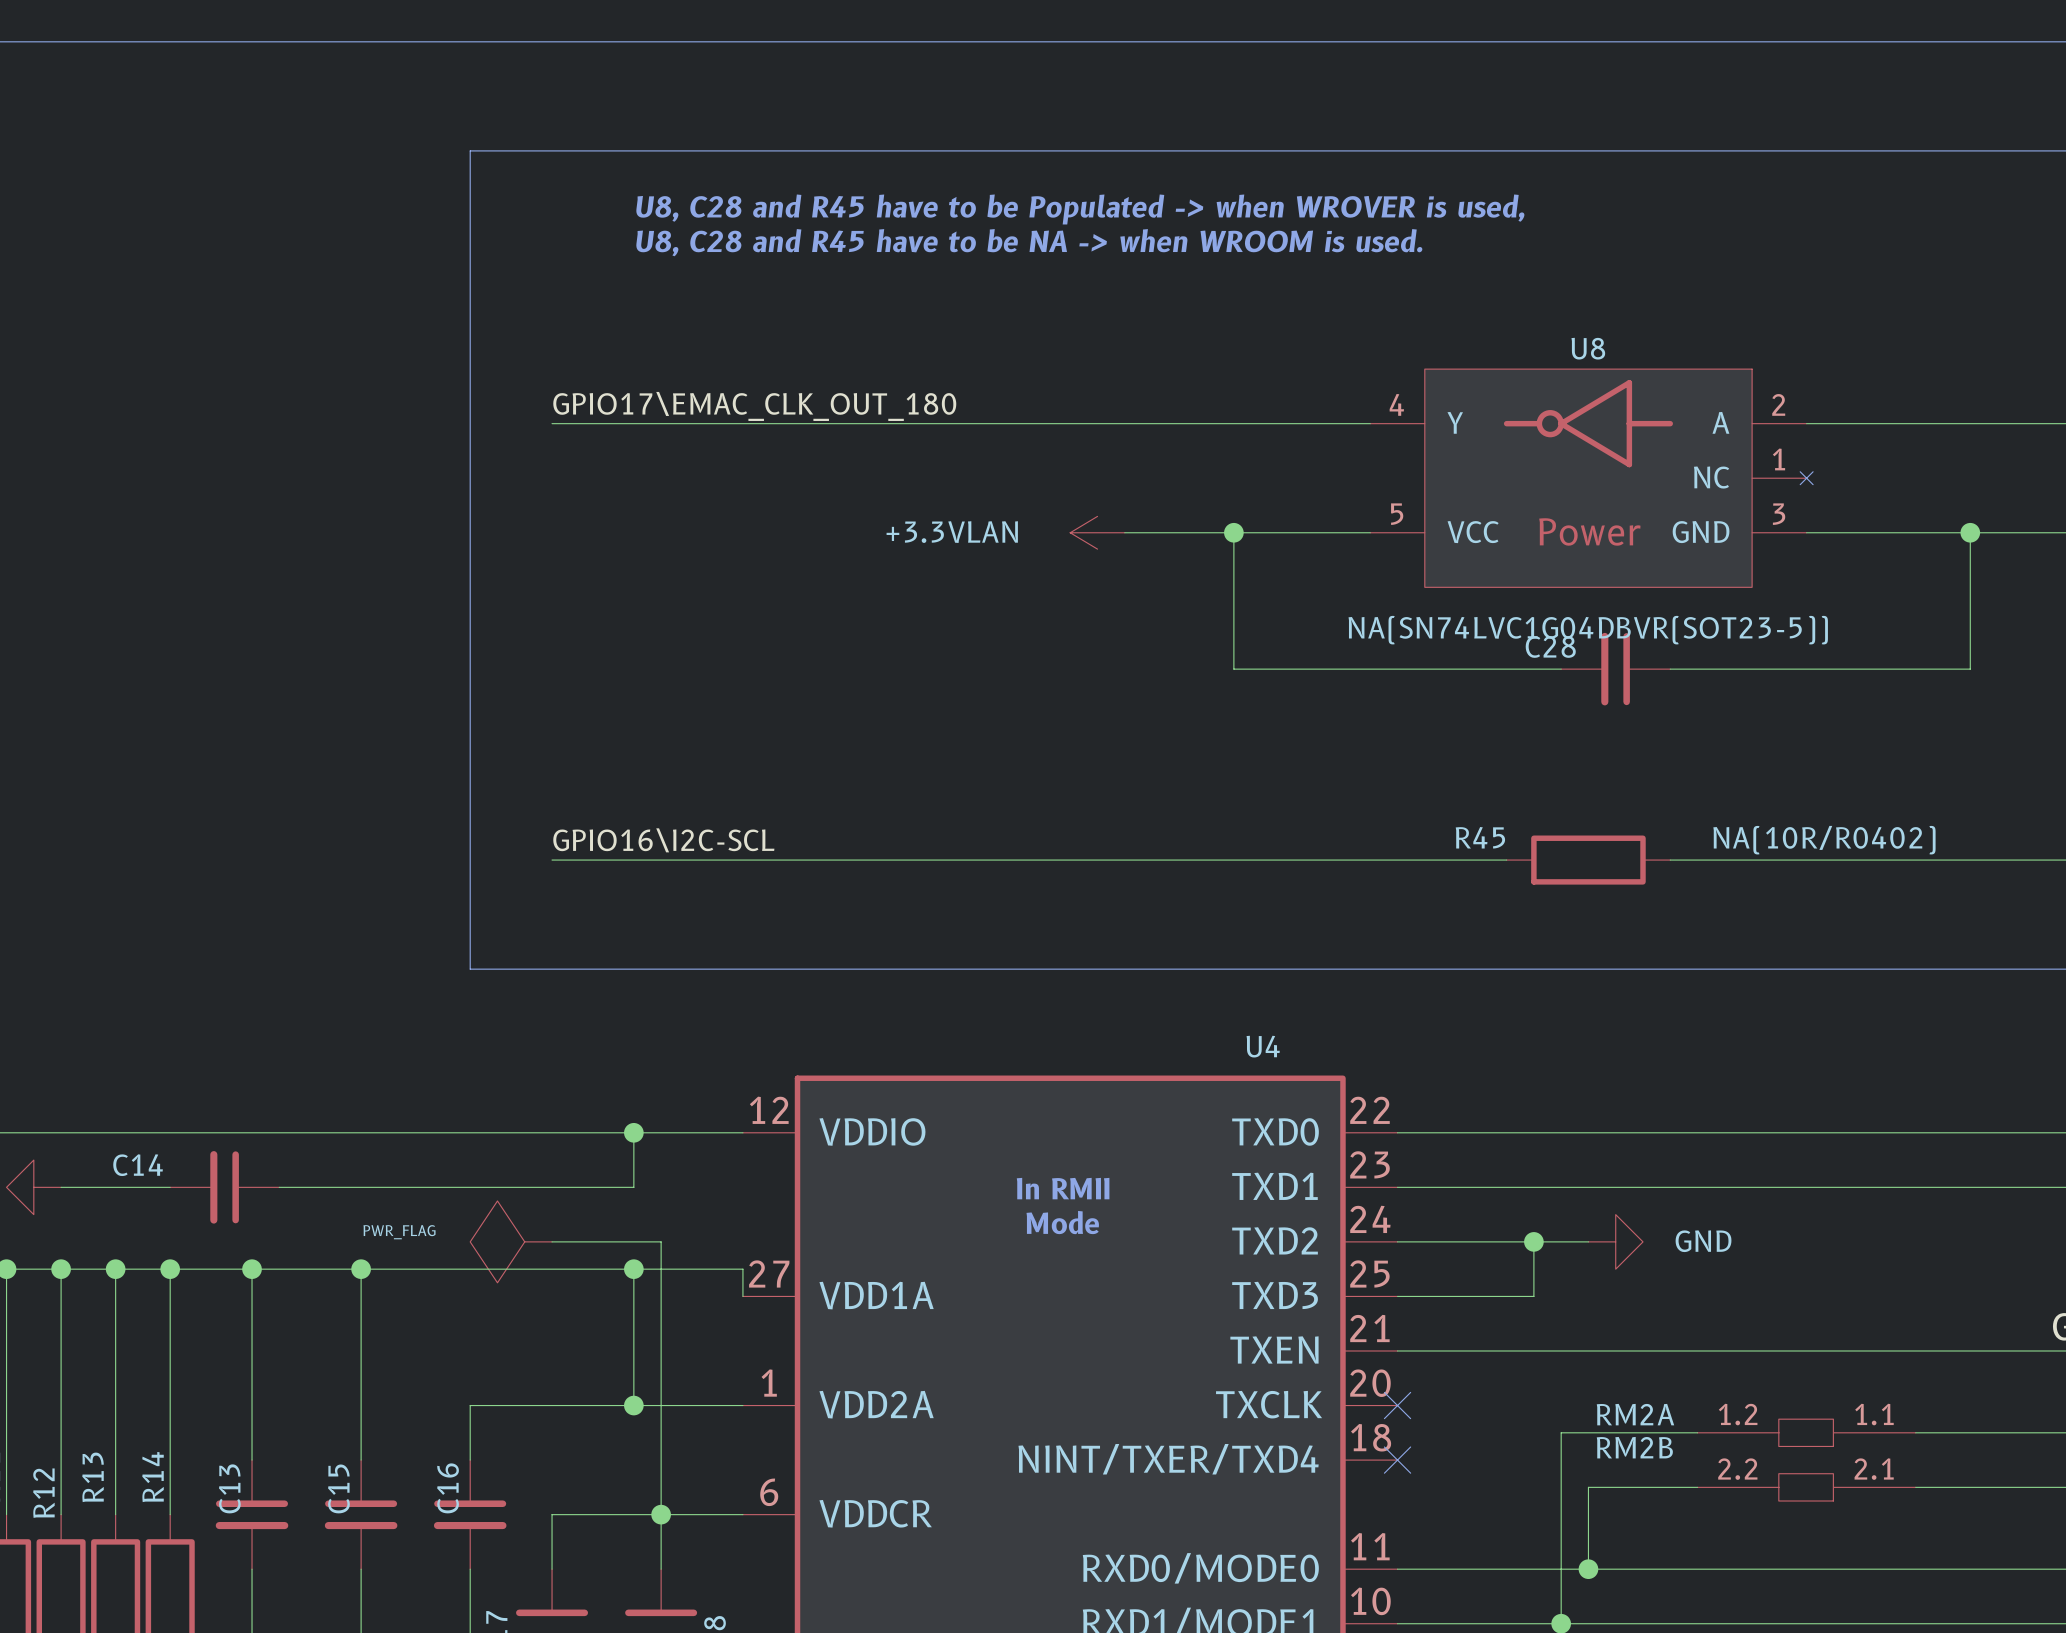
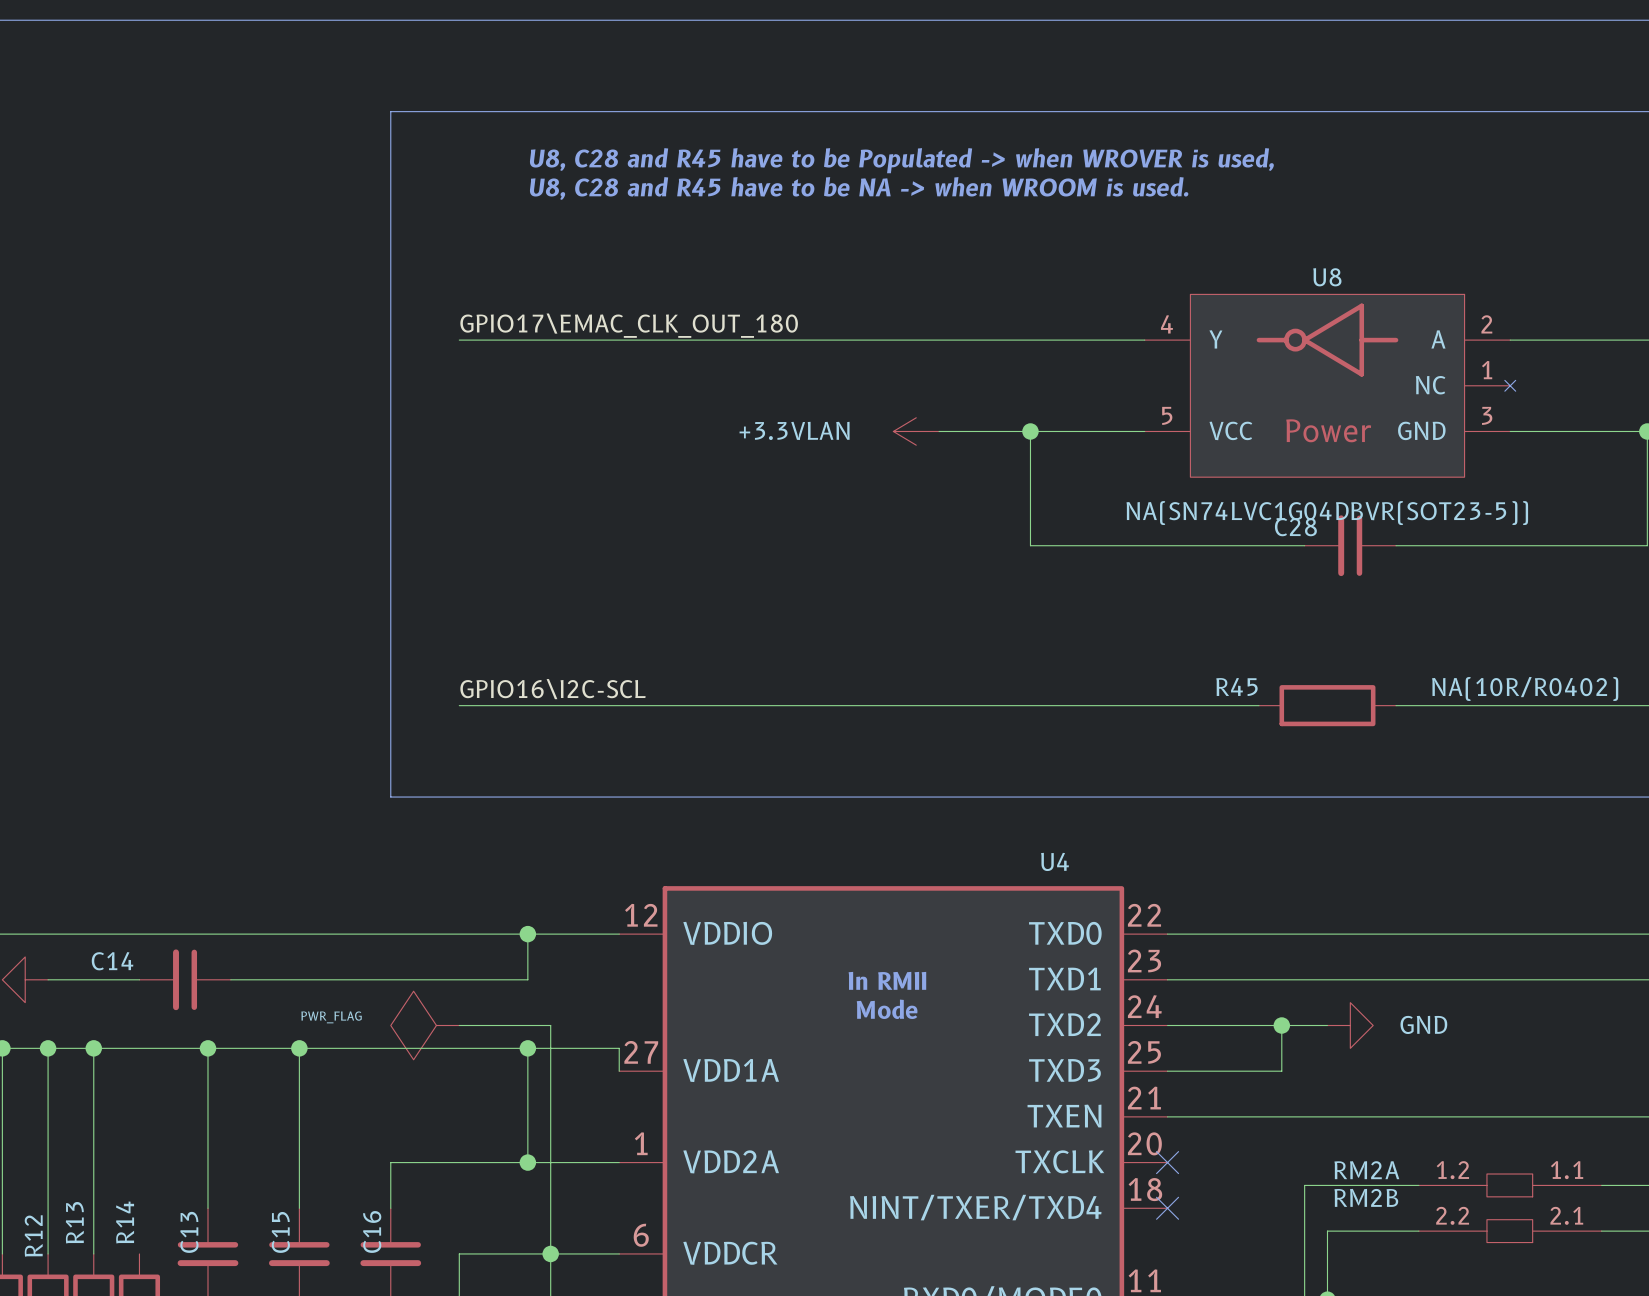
wire: (170, 1269) (170, 1514) -> none
junction: (170, 1269) -> none

